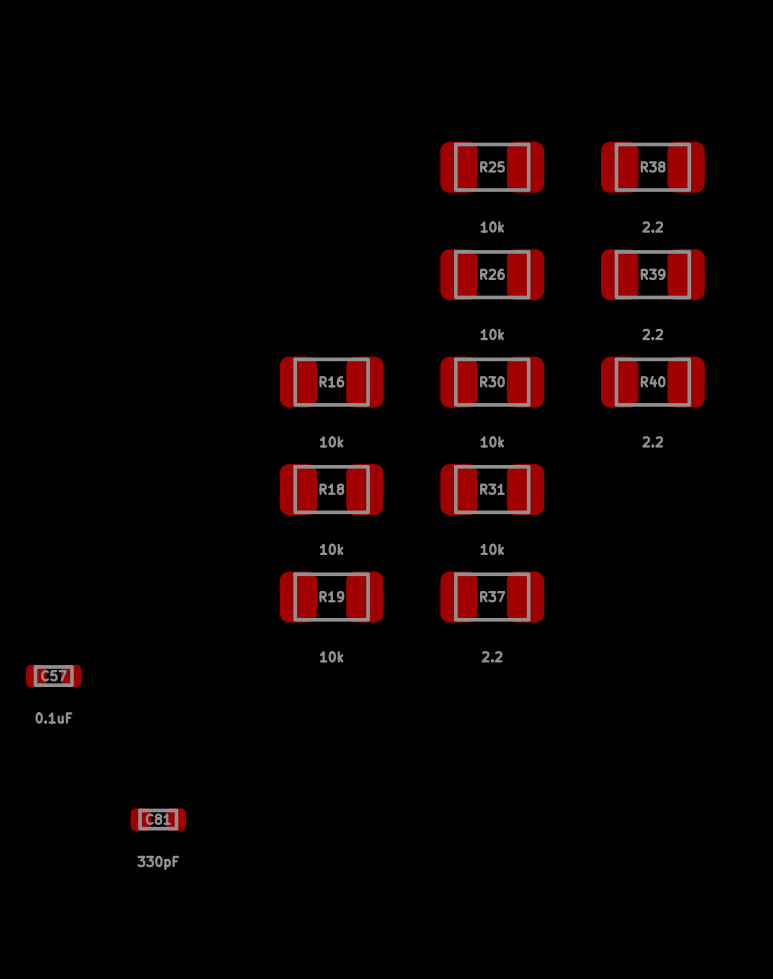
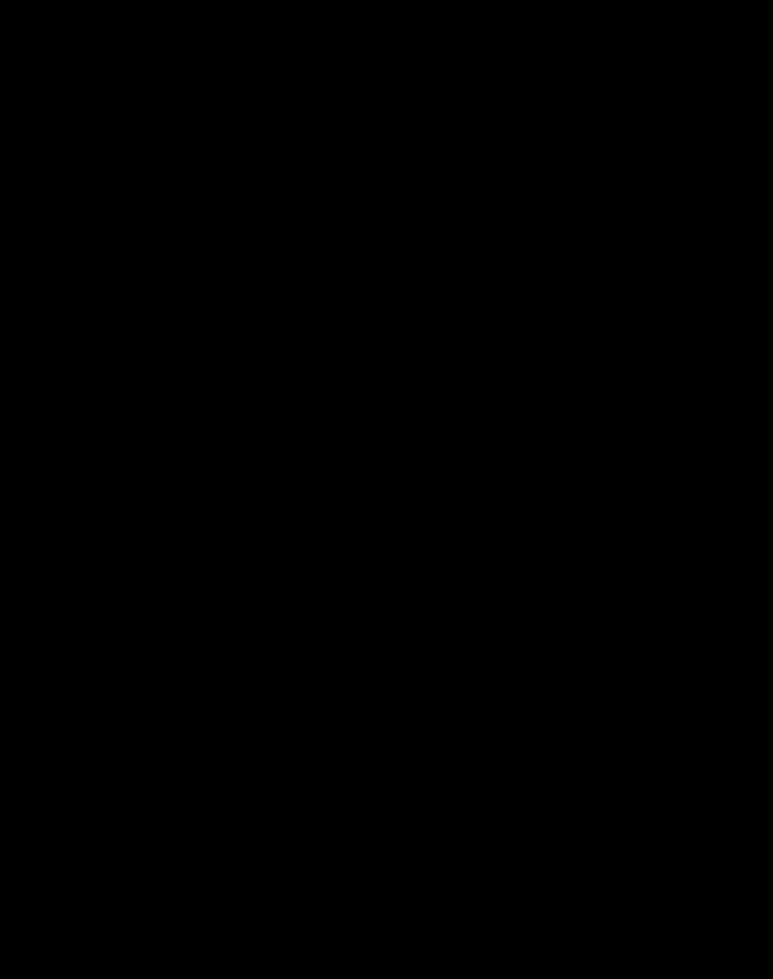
R25: 10k (492, 167) -> none
R38: 2.2 (652, 167) -> none
R26: 10k (492, 274) -> none
R39: 2.2 (652, 274) -> none
R16: 10k (331, 382) -> none
R30: 10k (492, 382) -> none
R40: 2.2 (652, 382) -> none
R18: 10k (331, 489) -> none
R31: 10k (492, 489) -> none
R19: 10k (331, 597) -> none
R37: 2.2 (492, 597) -> none
C57: 0.1uF (53, 676) -> none
C81: 330pF (158, 819) -> none

